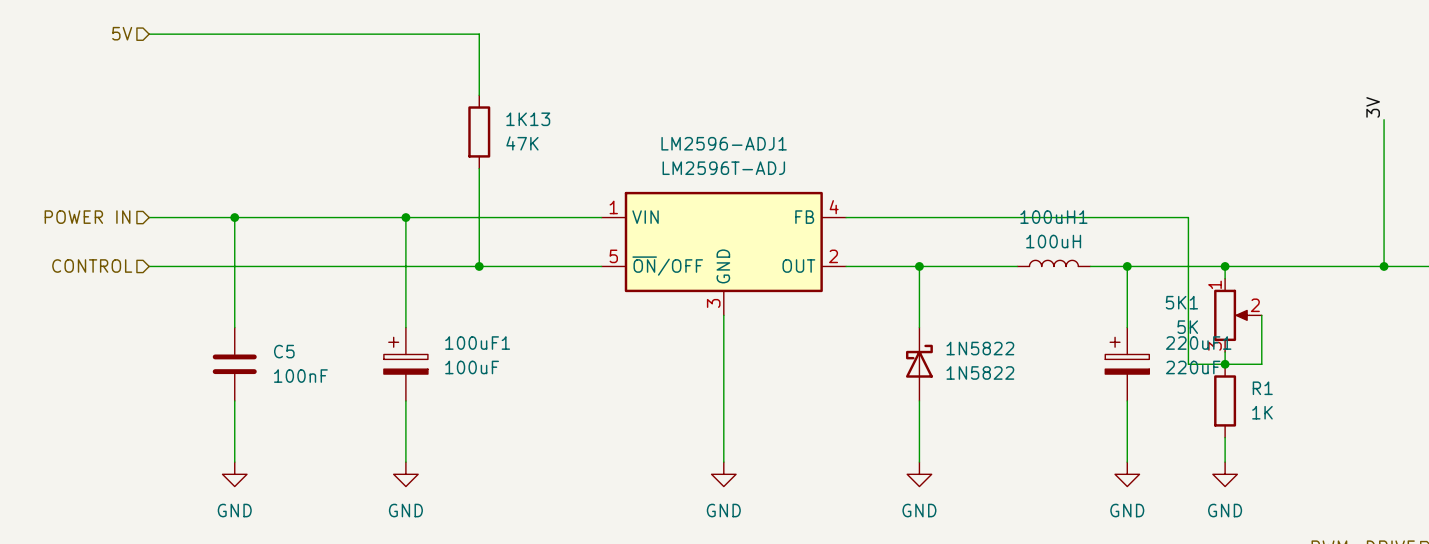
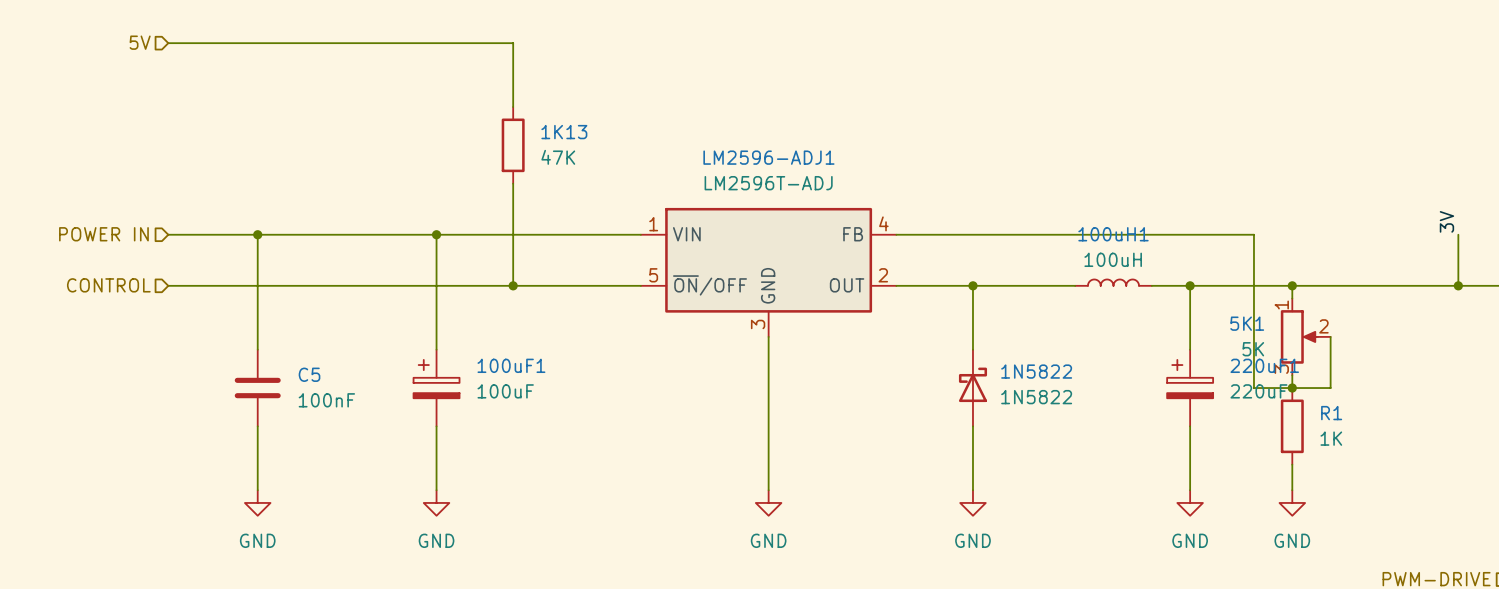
label position: 3V (1373, 107) -> 3V (1446, 221)
wire: (1384, 119) (1384, 217) -> none

